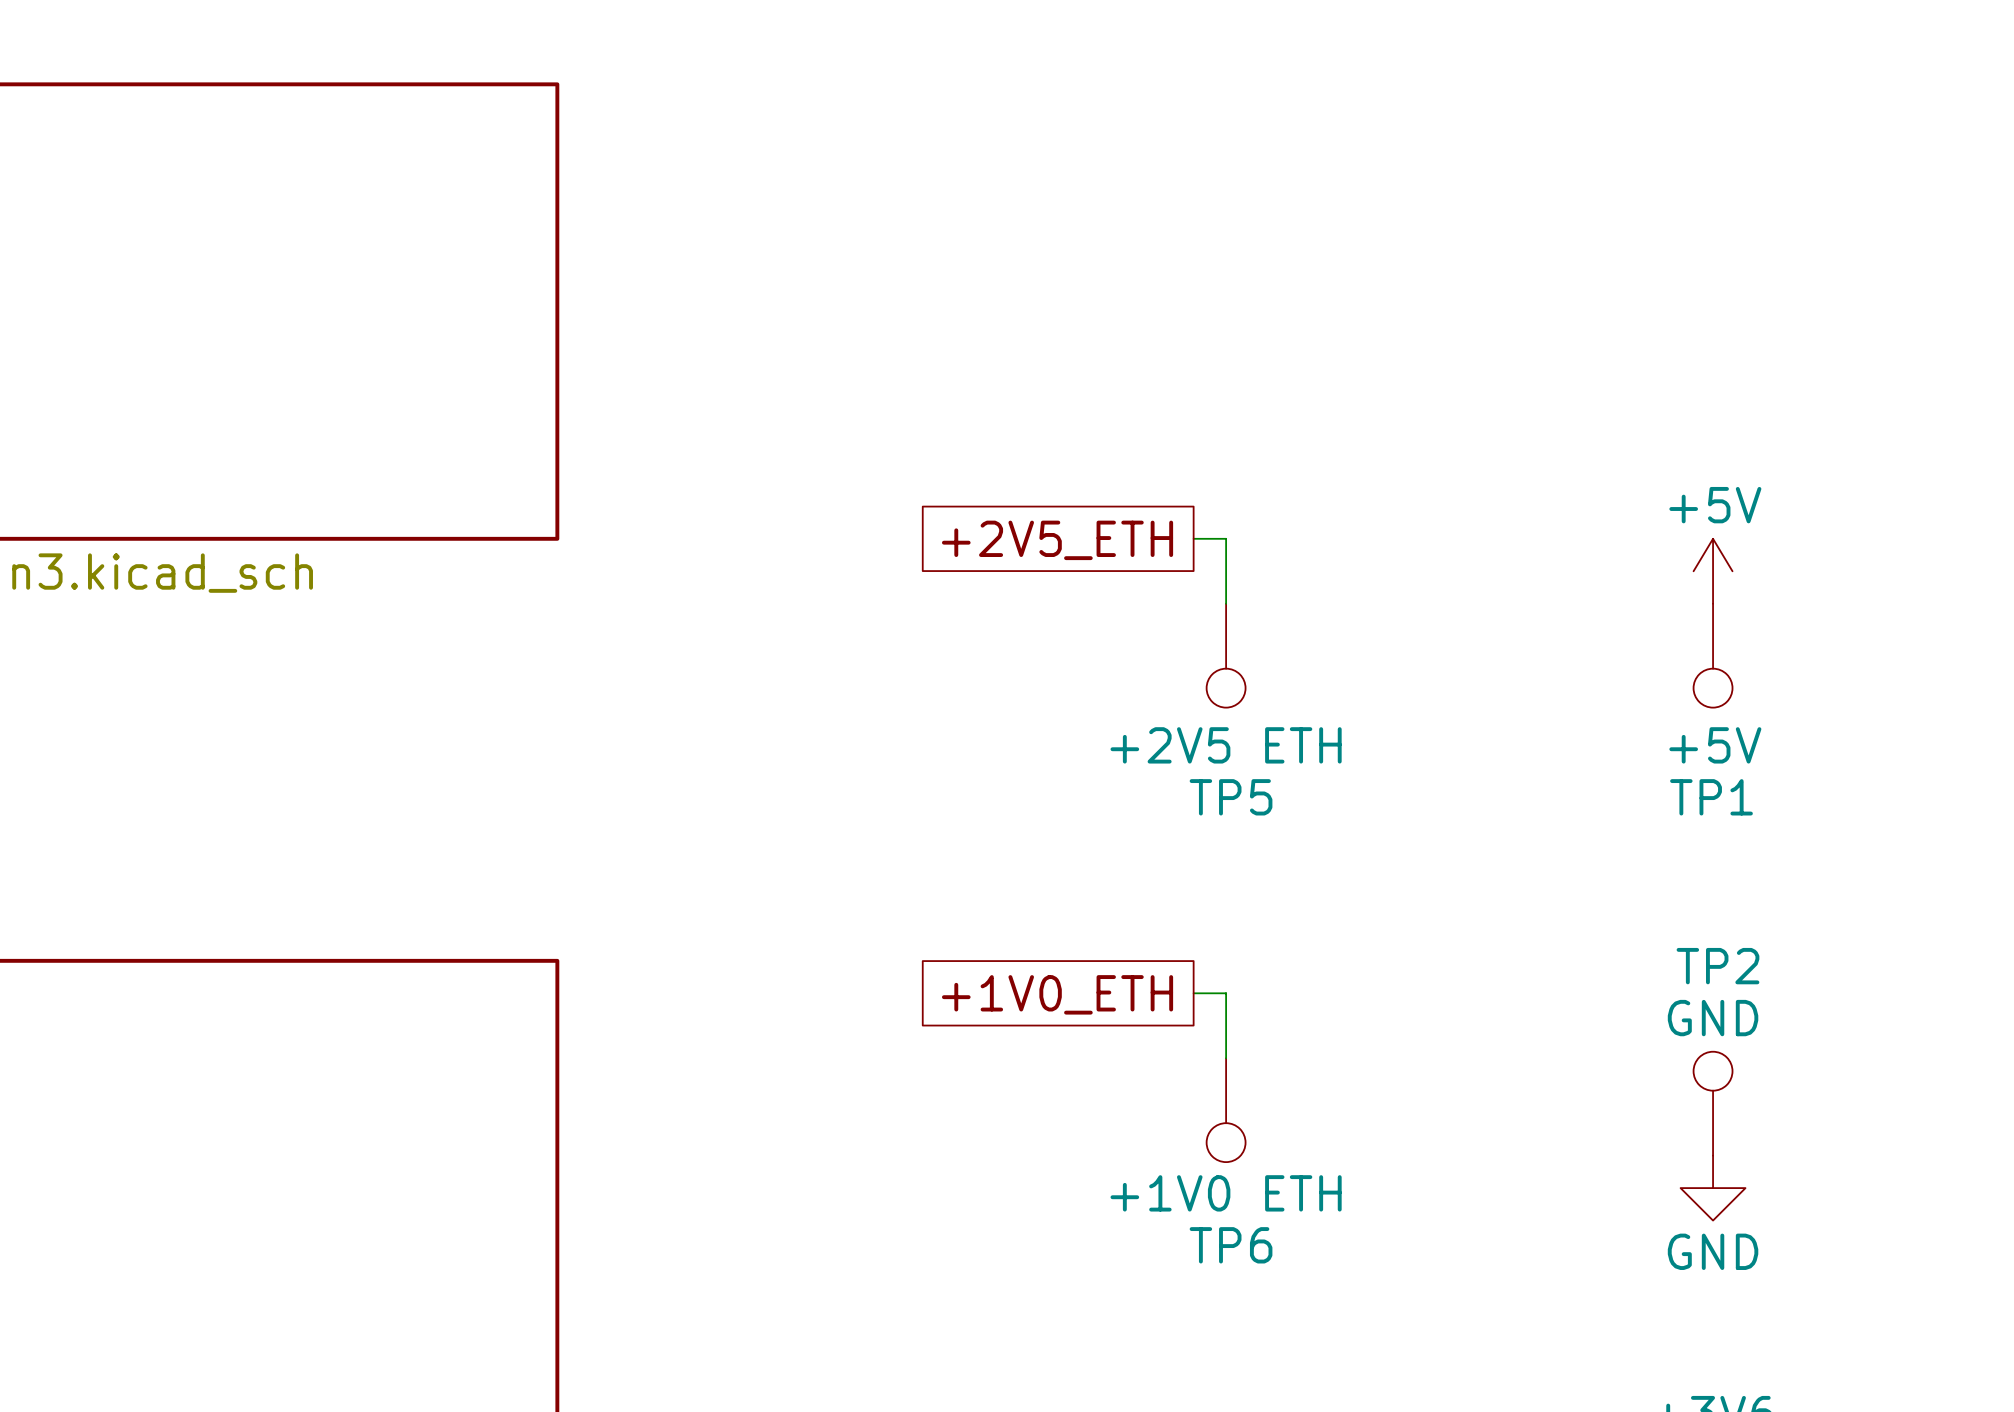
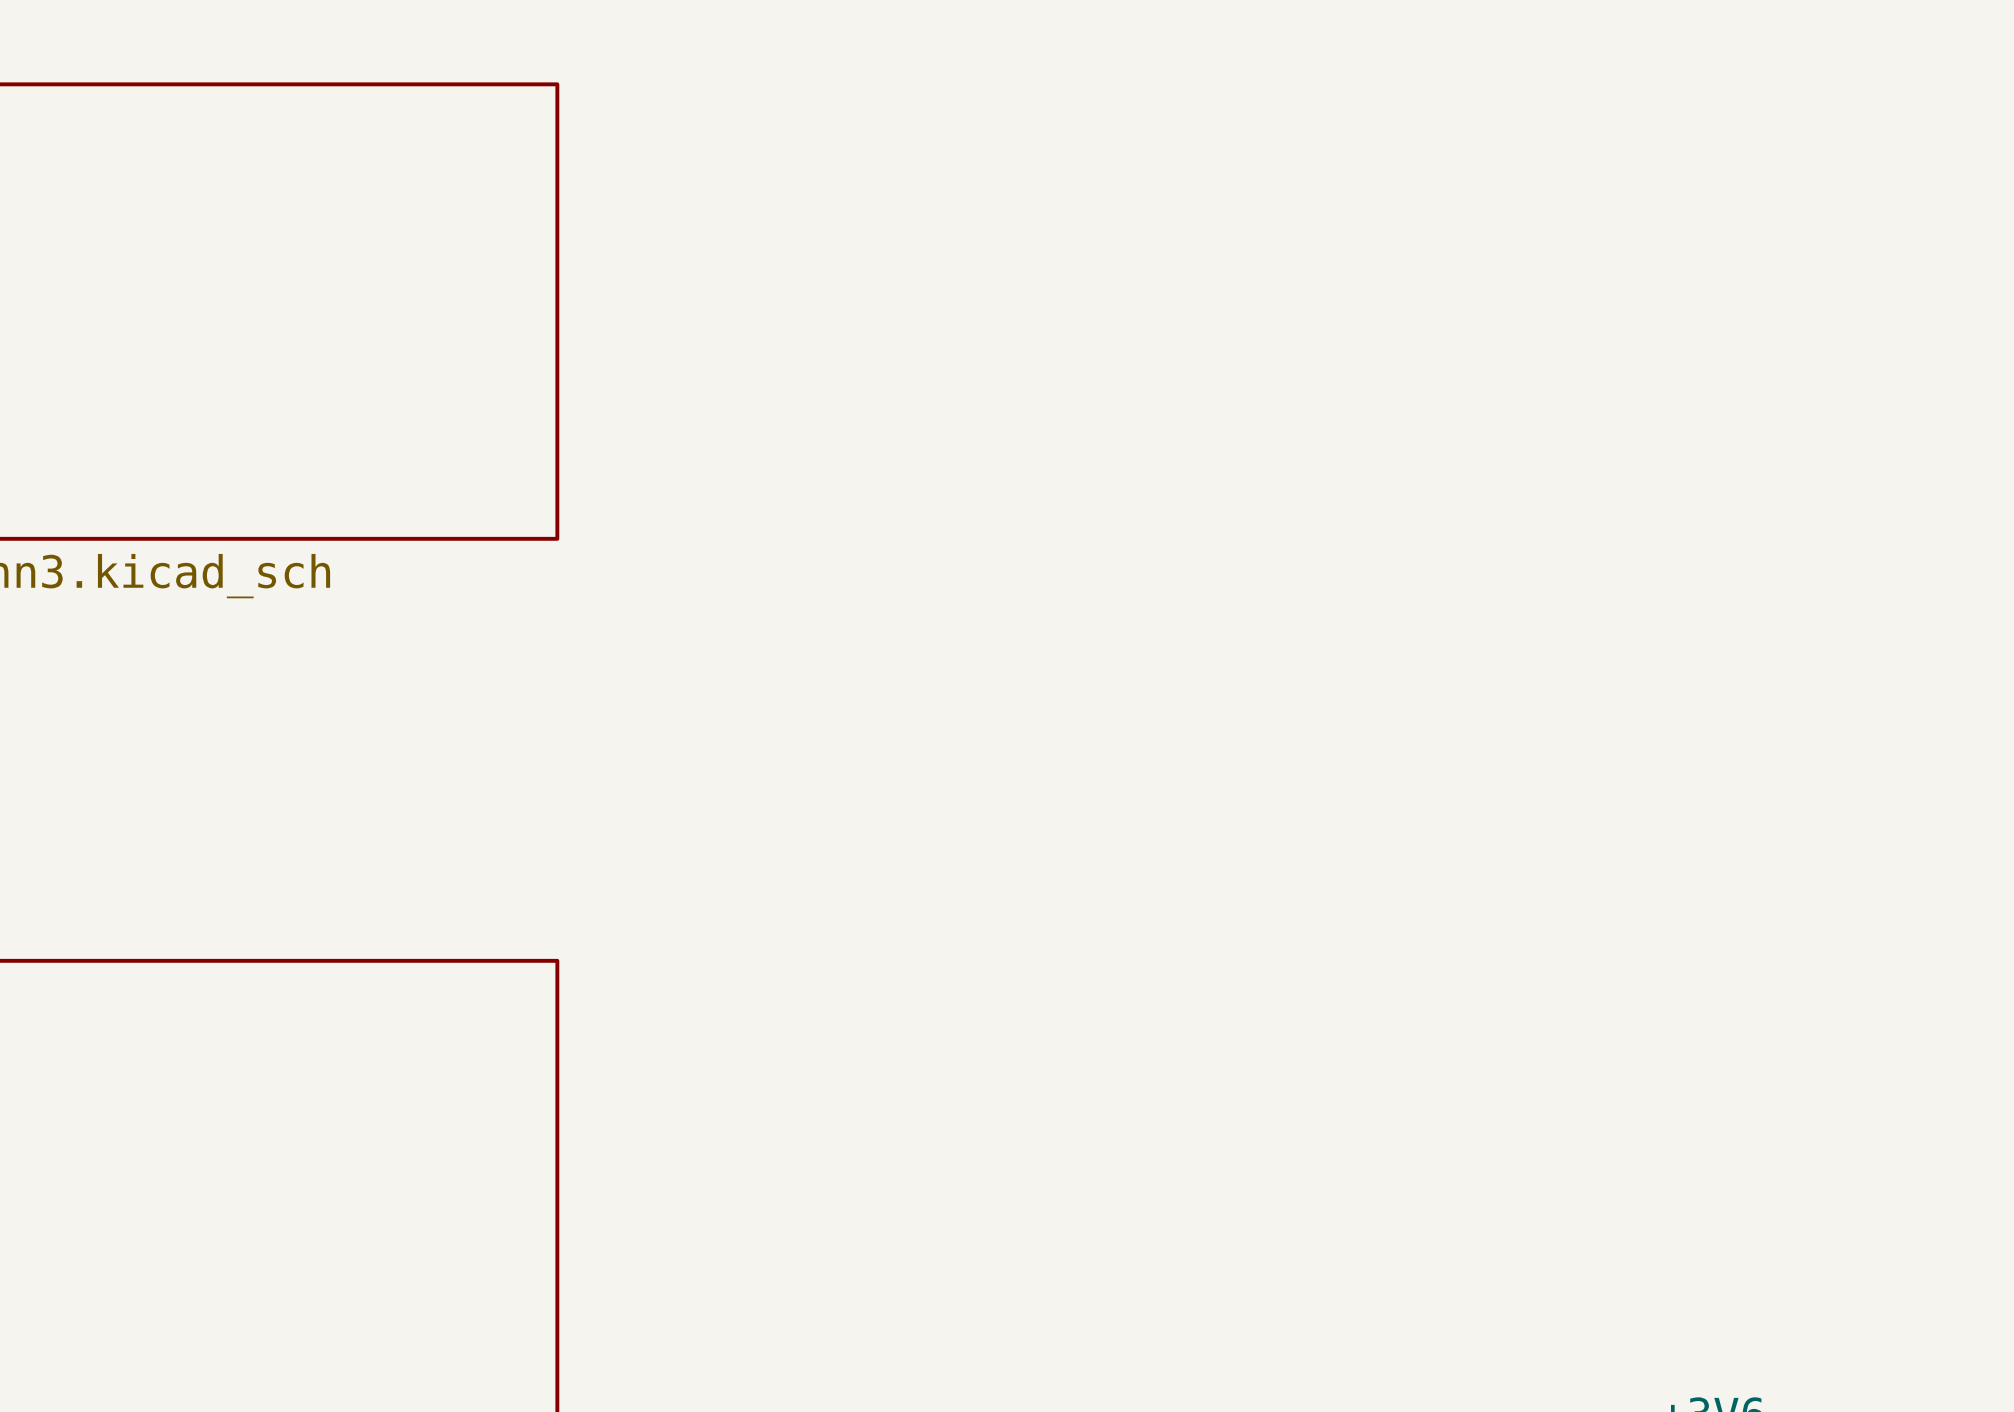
wire: (1193, 538) (1226, 538) (1226, 603) -> none
global label: +2V5_ETH (1057, 540) -> none
power symbol: +5V (1713, 571) -> none
TP5: +2V5 ETH (1226, 655) -> none
TP1: +5V (1713, 655) -> none
wire: (1193, 993) (1226, 993) (1226, 1058) -> none
global label: +1V0_ETH (1057, 994) -> none
TP2: GND (1713, 1103) -> none
TP6: +1V0 ETH (1226, 1110) -> none
power symbol: GND (1713, 1188) -> none

